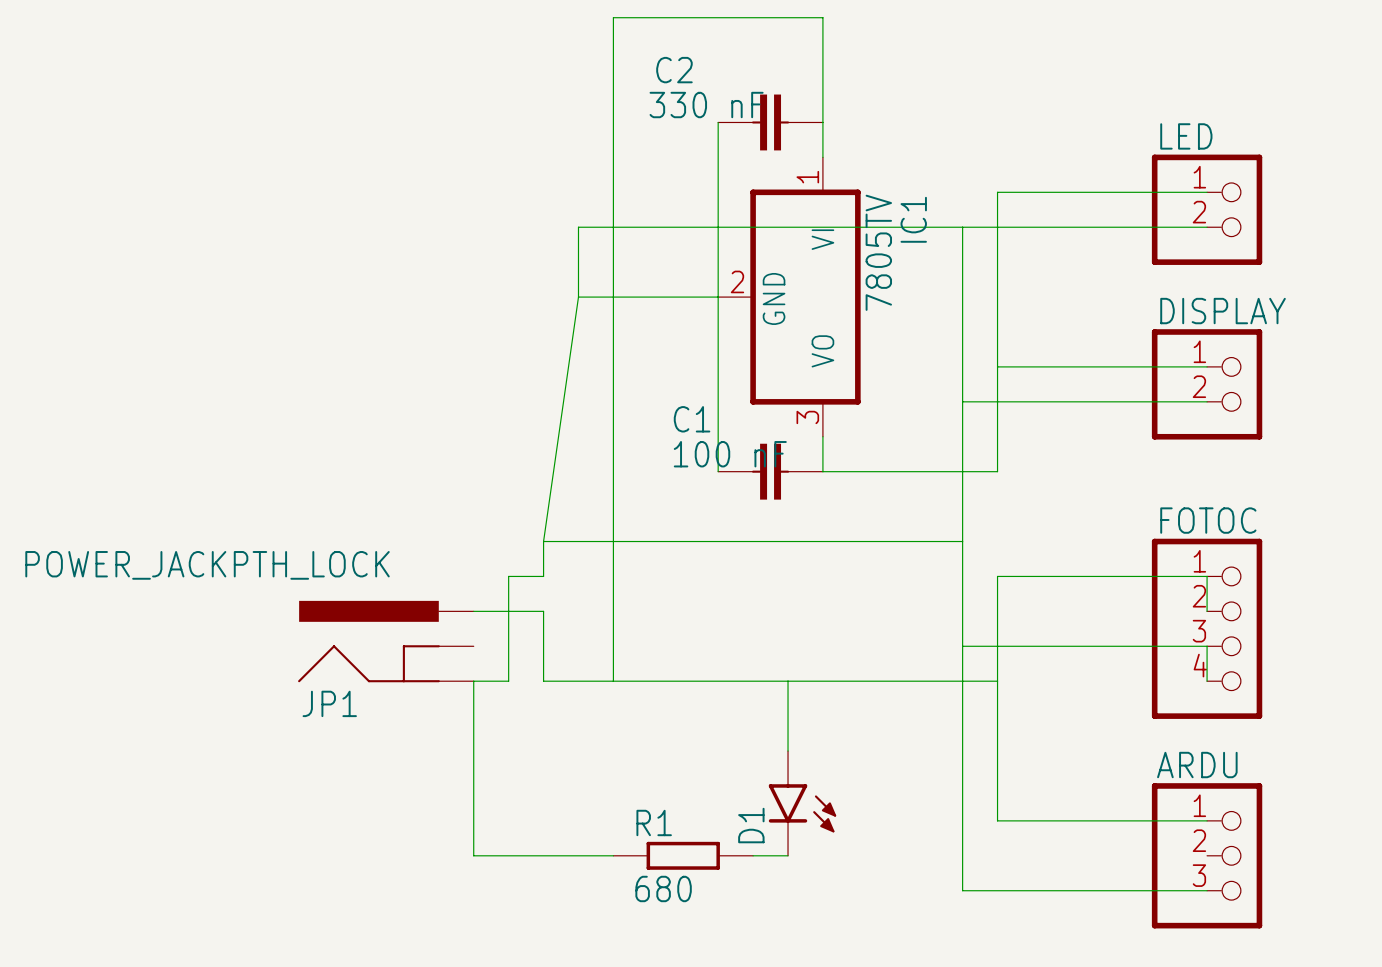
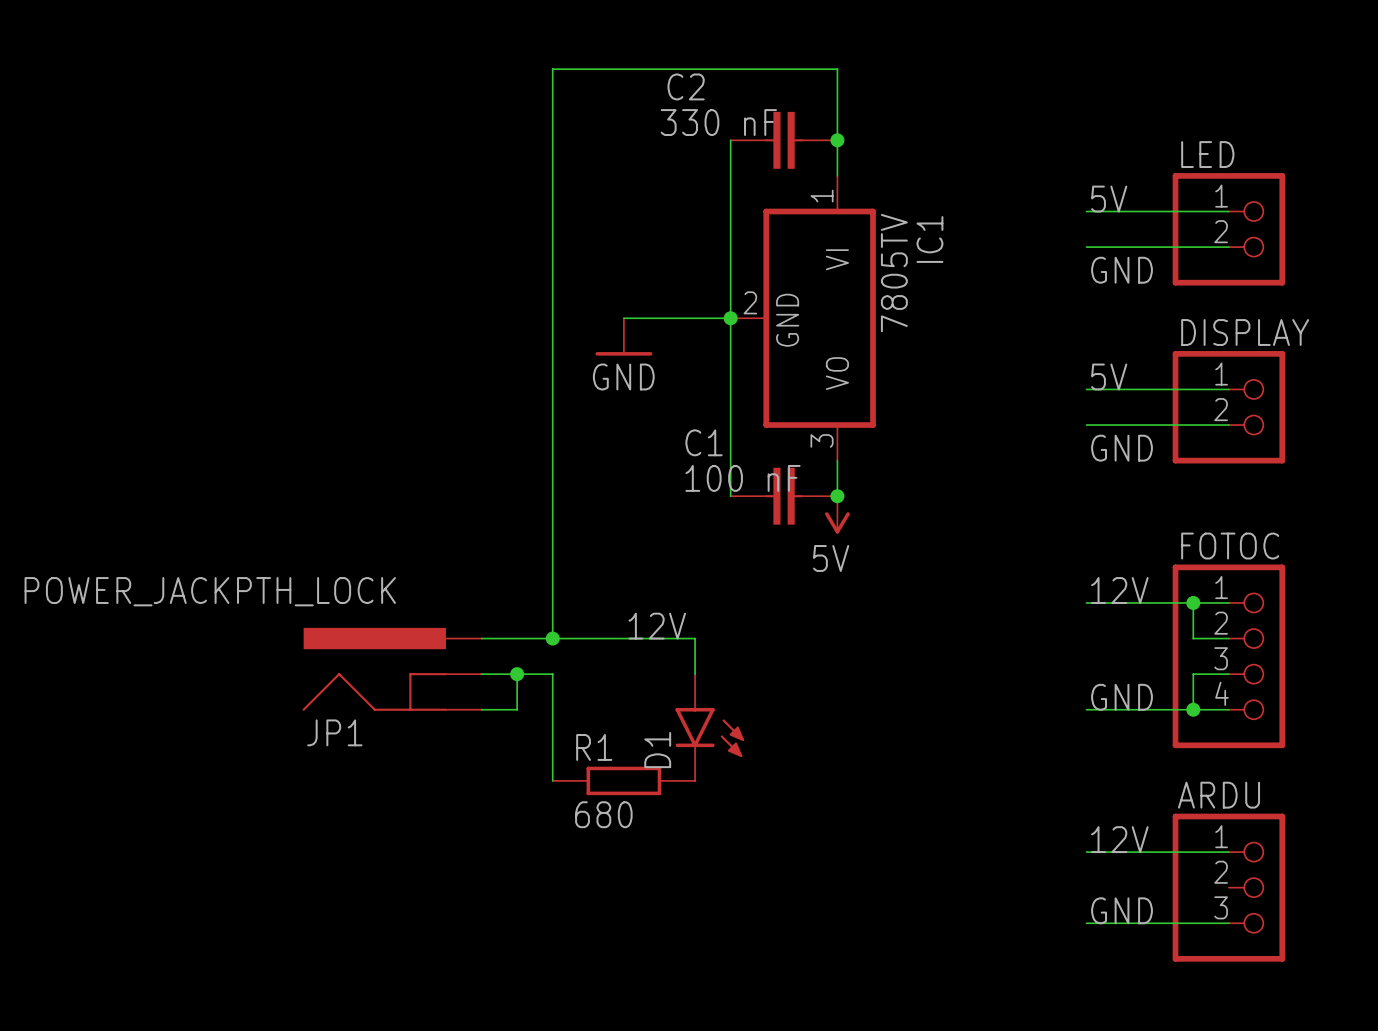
wire: (822, 52) (822, 17) (613, 17) (613, 681) -> (837, 69) (552, 69) (552, 567)
junction: none -> (837, 140)
label: none -> 5V (1109, 199)
wire: (1067, 192) (997, 192) (997, 471) (822, 471) -> none
wire: (962, 227) (962, 890) (1067, 890) -> none
wire: (1067, 227) (578, 227) (578, 297) -> none
label: none -> GND (1122, 270)
wire: (578, 297) (543, 541) (962, 541) -> none
wire: (578, 297) (613, 297) -> none
junction: none -> (730, 318)
power symbol: none -> GND (623, 336)
label: none -> 5V (1109, 376)
wire: (997, 366) (1067, 366) -> none
wire: (962, 401) (1067, 401) -> none
label: none -> GND (1122, 448)
junction: none -> (837, 496)
power symbol: none -> 5V (837, 514)
label: none -> 12V (1119, 590)
wire: (543, 576) (508, 576) (508, 646) -> (552, 602) (552, 638) (695, 638) (695, 674)
wire: (1067, 576) (997, 576) (997, 820) (1067, 820) -> none
junction: none -> (1193, 602)
wire: (1207, 576) (1207, 611) -> (1193, 602) (1193, 638) (1228, 638)
label: none -> 12V (657, 626)
wire: (543, 611) (543, 646) -> (481, 674) (552, 674)
junction: none -> (552, 638)
junction: none -> (517, 674)
wire: (962, 646) (1172, 646) -> (1193, 709) (1193, 674)
wire: (1207, 646) (1207, 681) -> (1086, 709) (1228, 709)
label: none -> GND (1122, 697)
wire: (473, 681) (473, 855) (613, 855) -> none
wire: (543, 681) (997, 681) -> (552, 709) (552, 780)
wire: (788, 681) (788, 751) -> none
junction: none -> (1193, 709)
D1 position: (802, 803) -> (709, 727)
label: none -> 12V (1119, 839)
R1 position: (683, 855) -> (623, 780)
wire: (753, 855) (788, 855) -> none
label: none -> GND (1122, 910)

